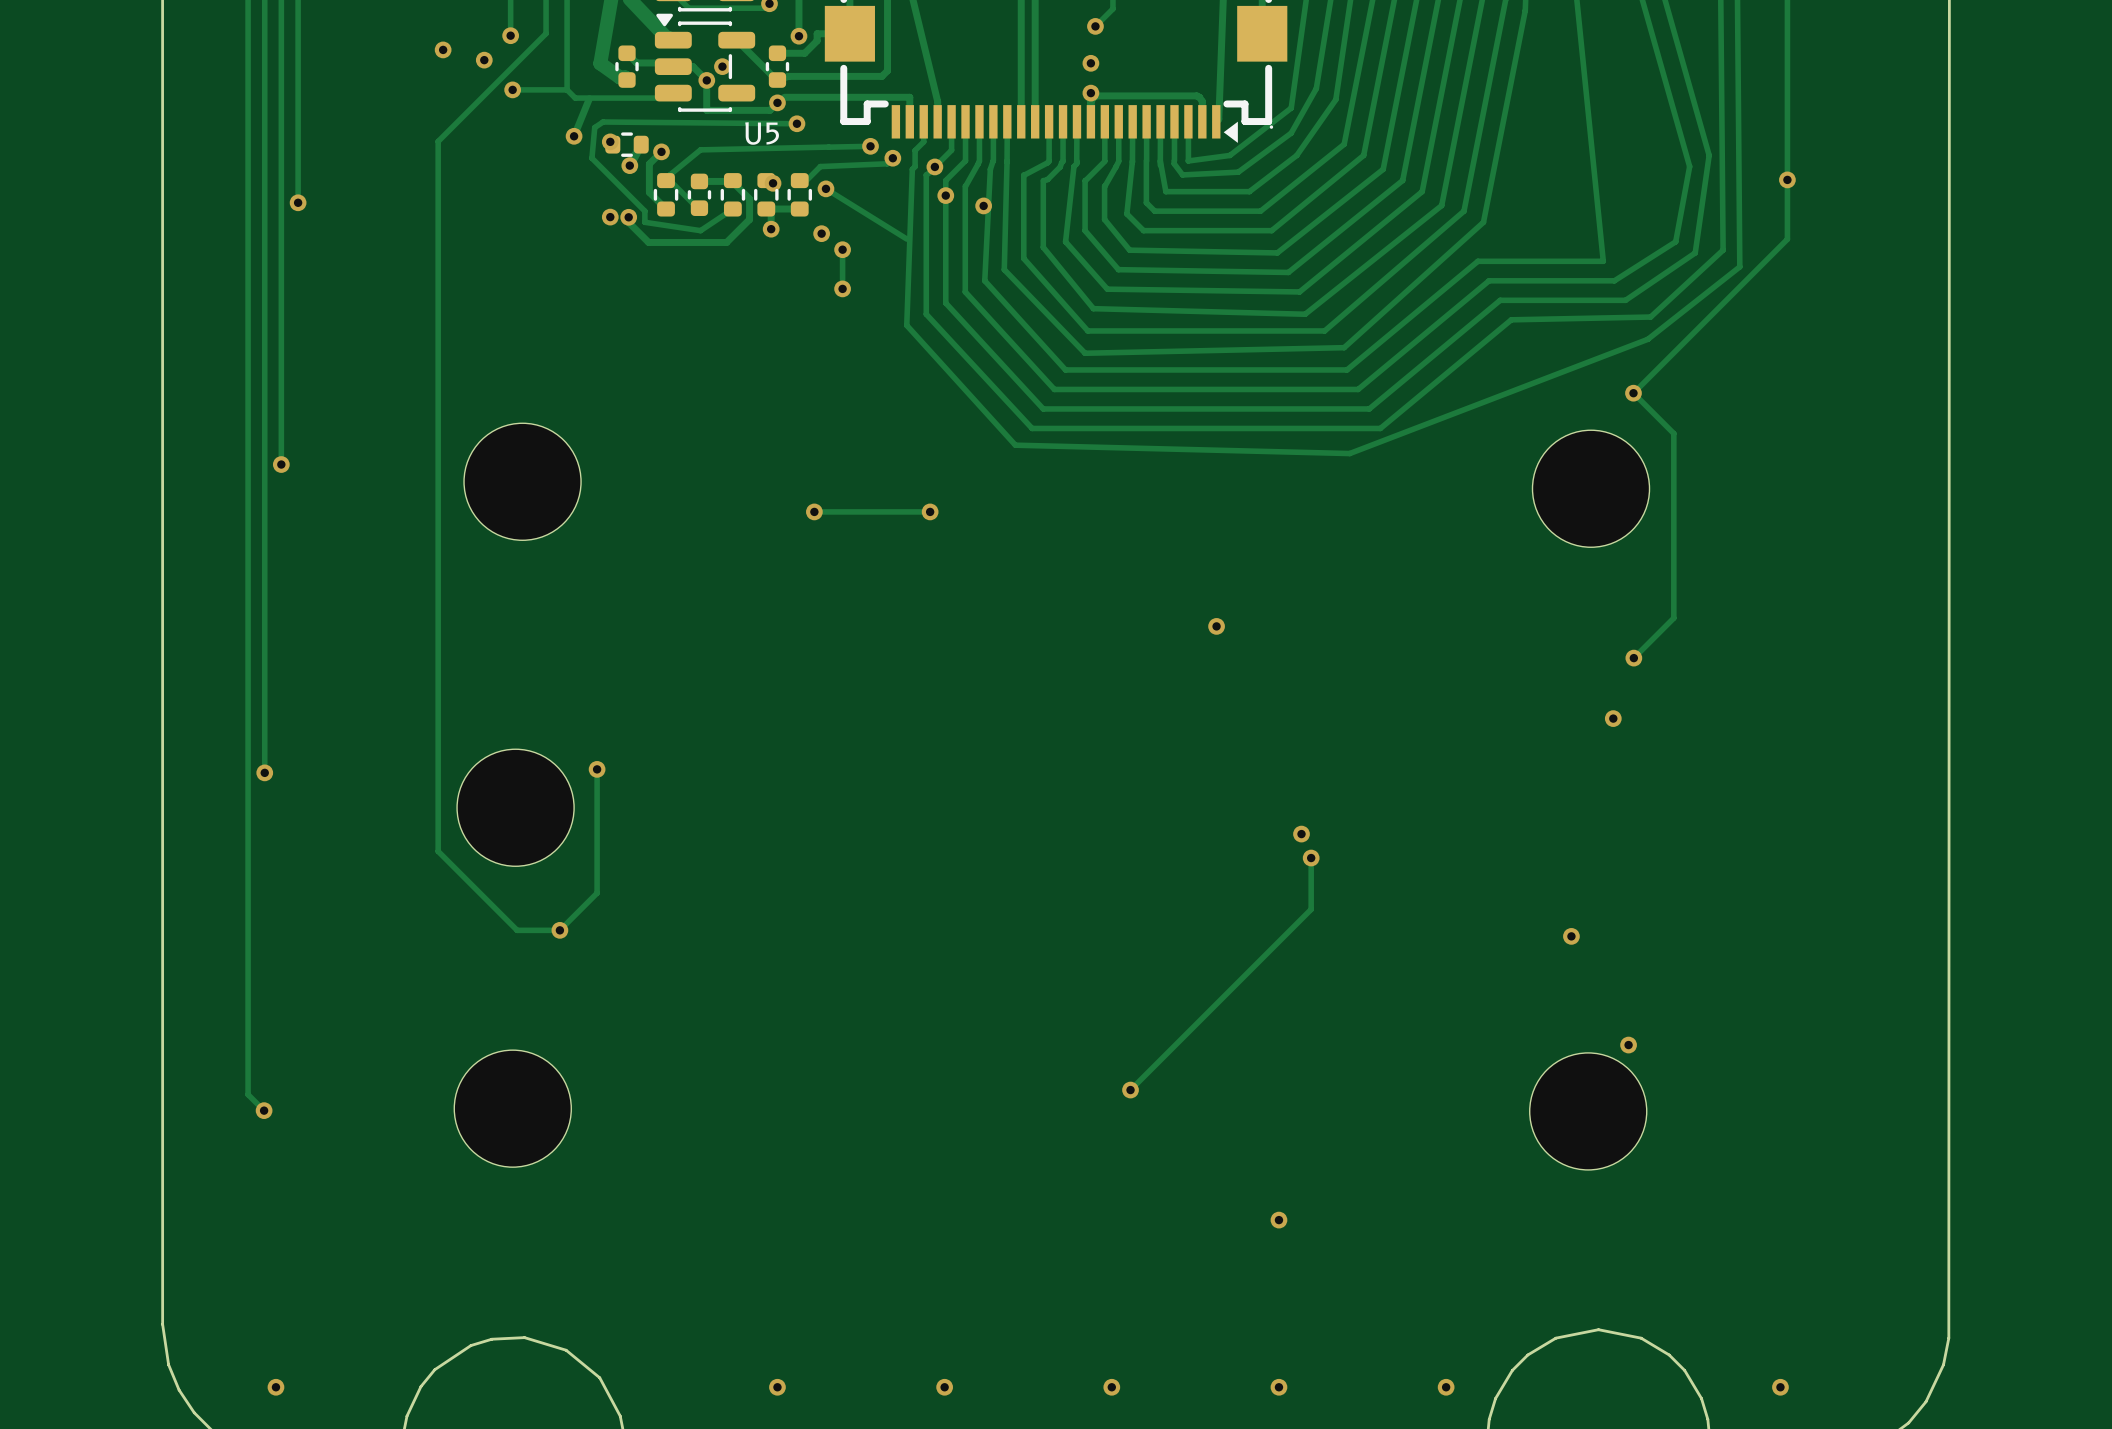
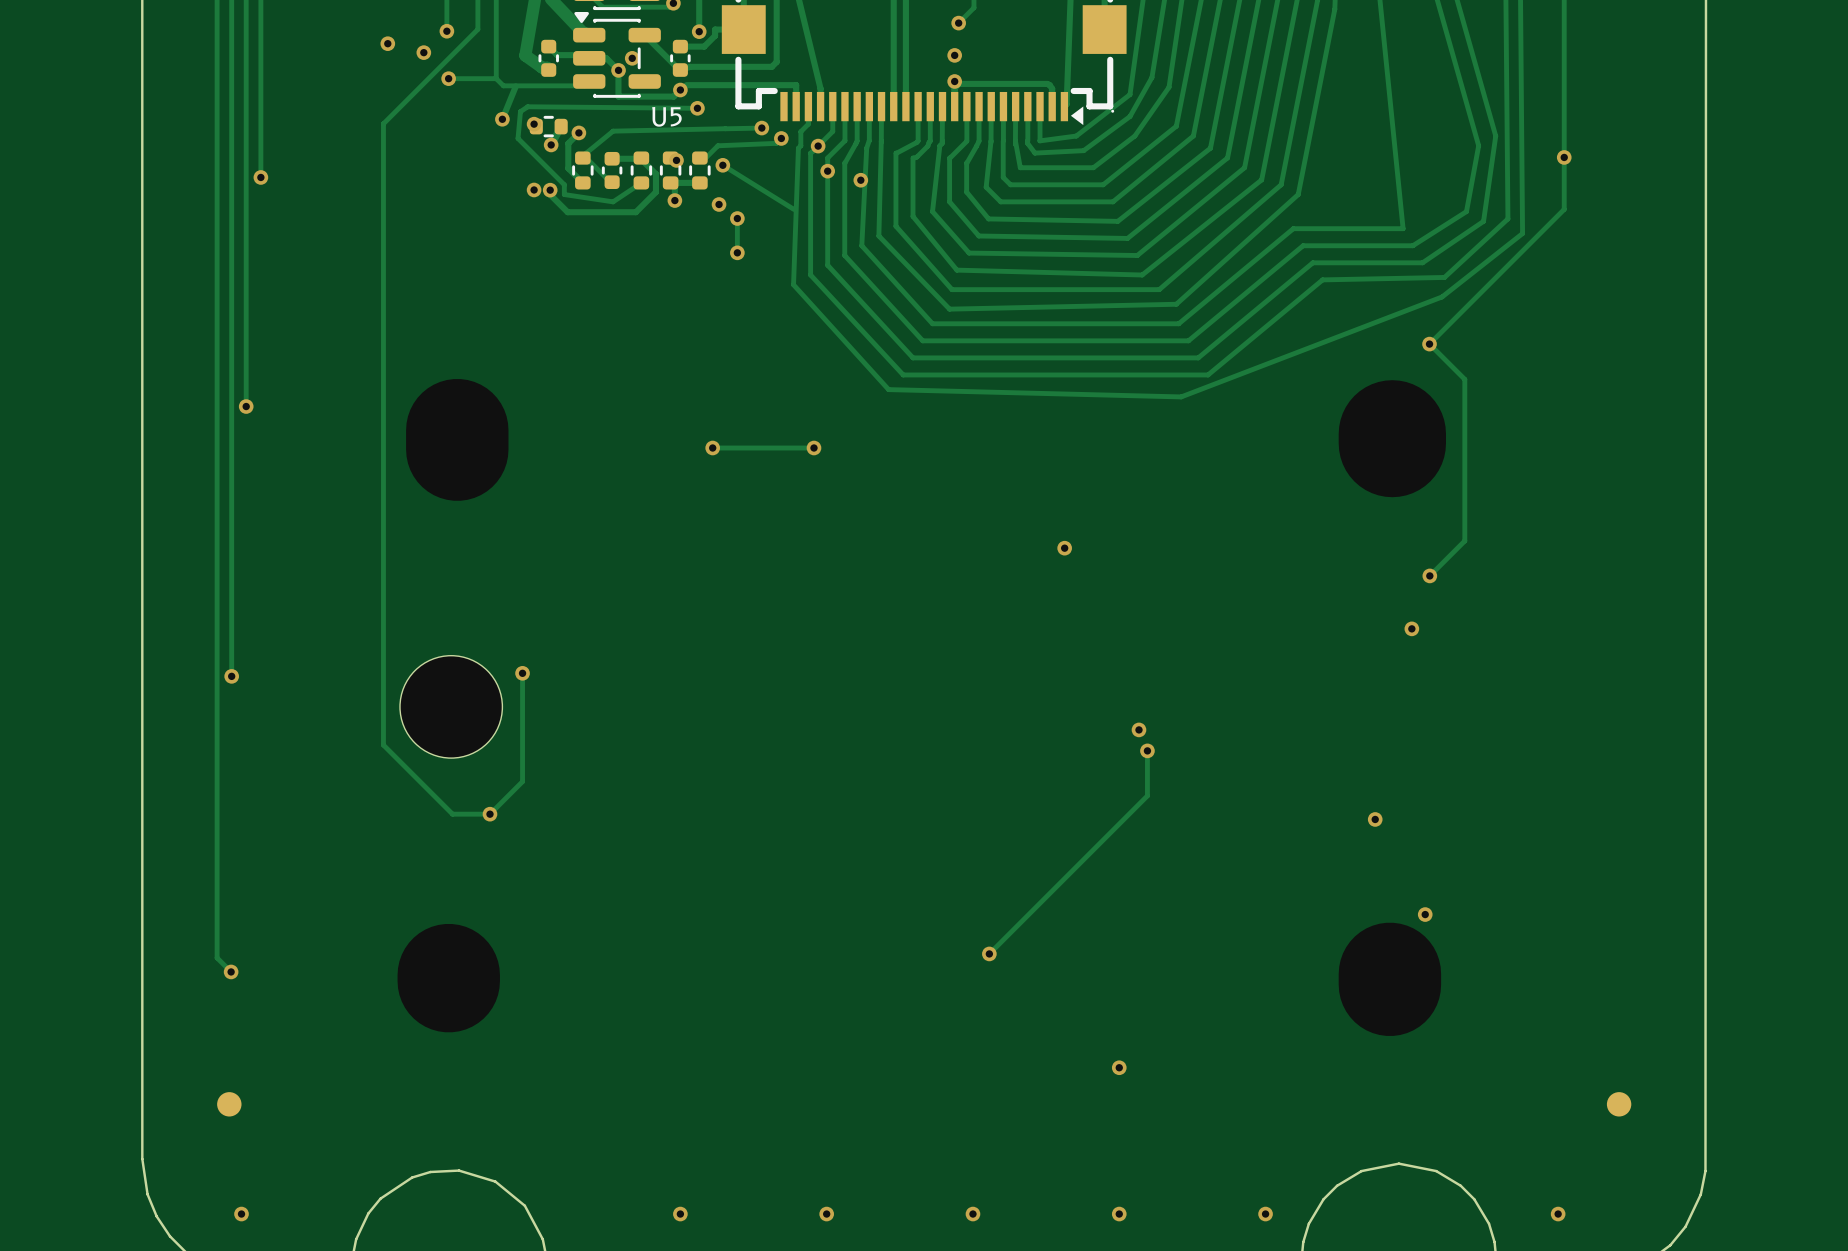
part footprint: [464, 423, 582, 541] -> [406, 378, 509, 501]
part footprint: [1532, 430, 1650, 548] -> [1338, 380, 1446, 498]
part footprint: [454, 1050, 572, 1168] -> [397, 923, 500, 1033]
part footprint: [1529, 1052, 1647, 1170] -> [1338, 922, 1442, 1037]
part: none -> (229, 1104)
part: none -> (1619, 1104)

